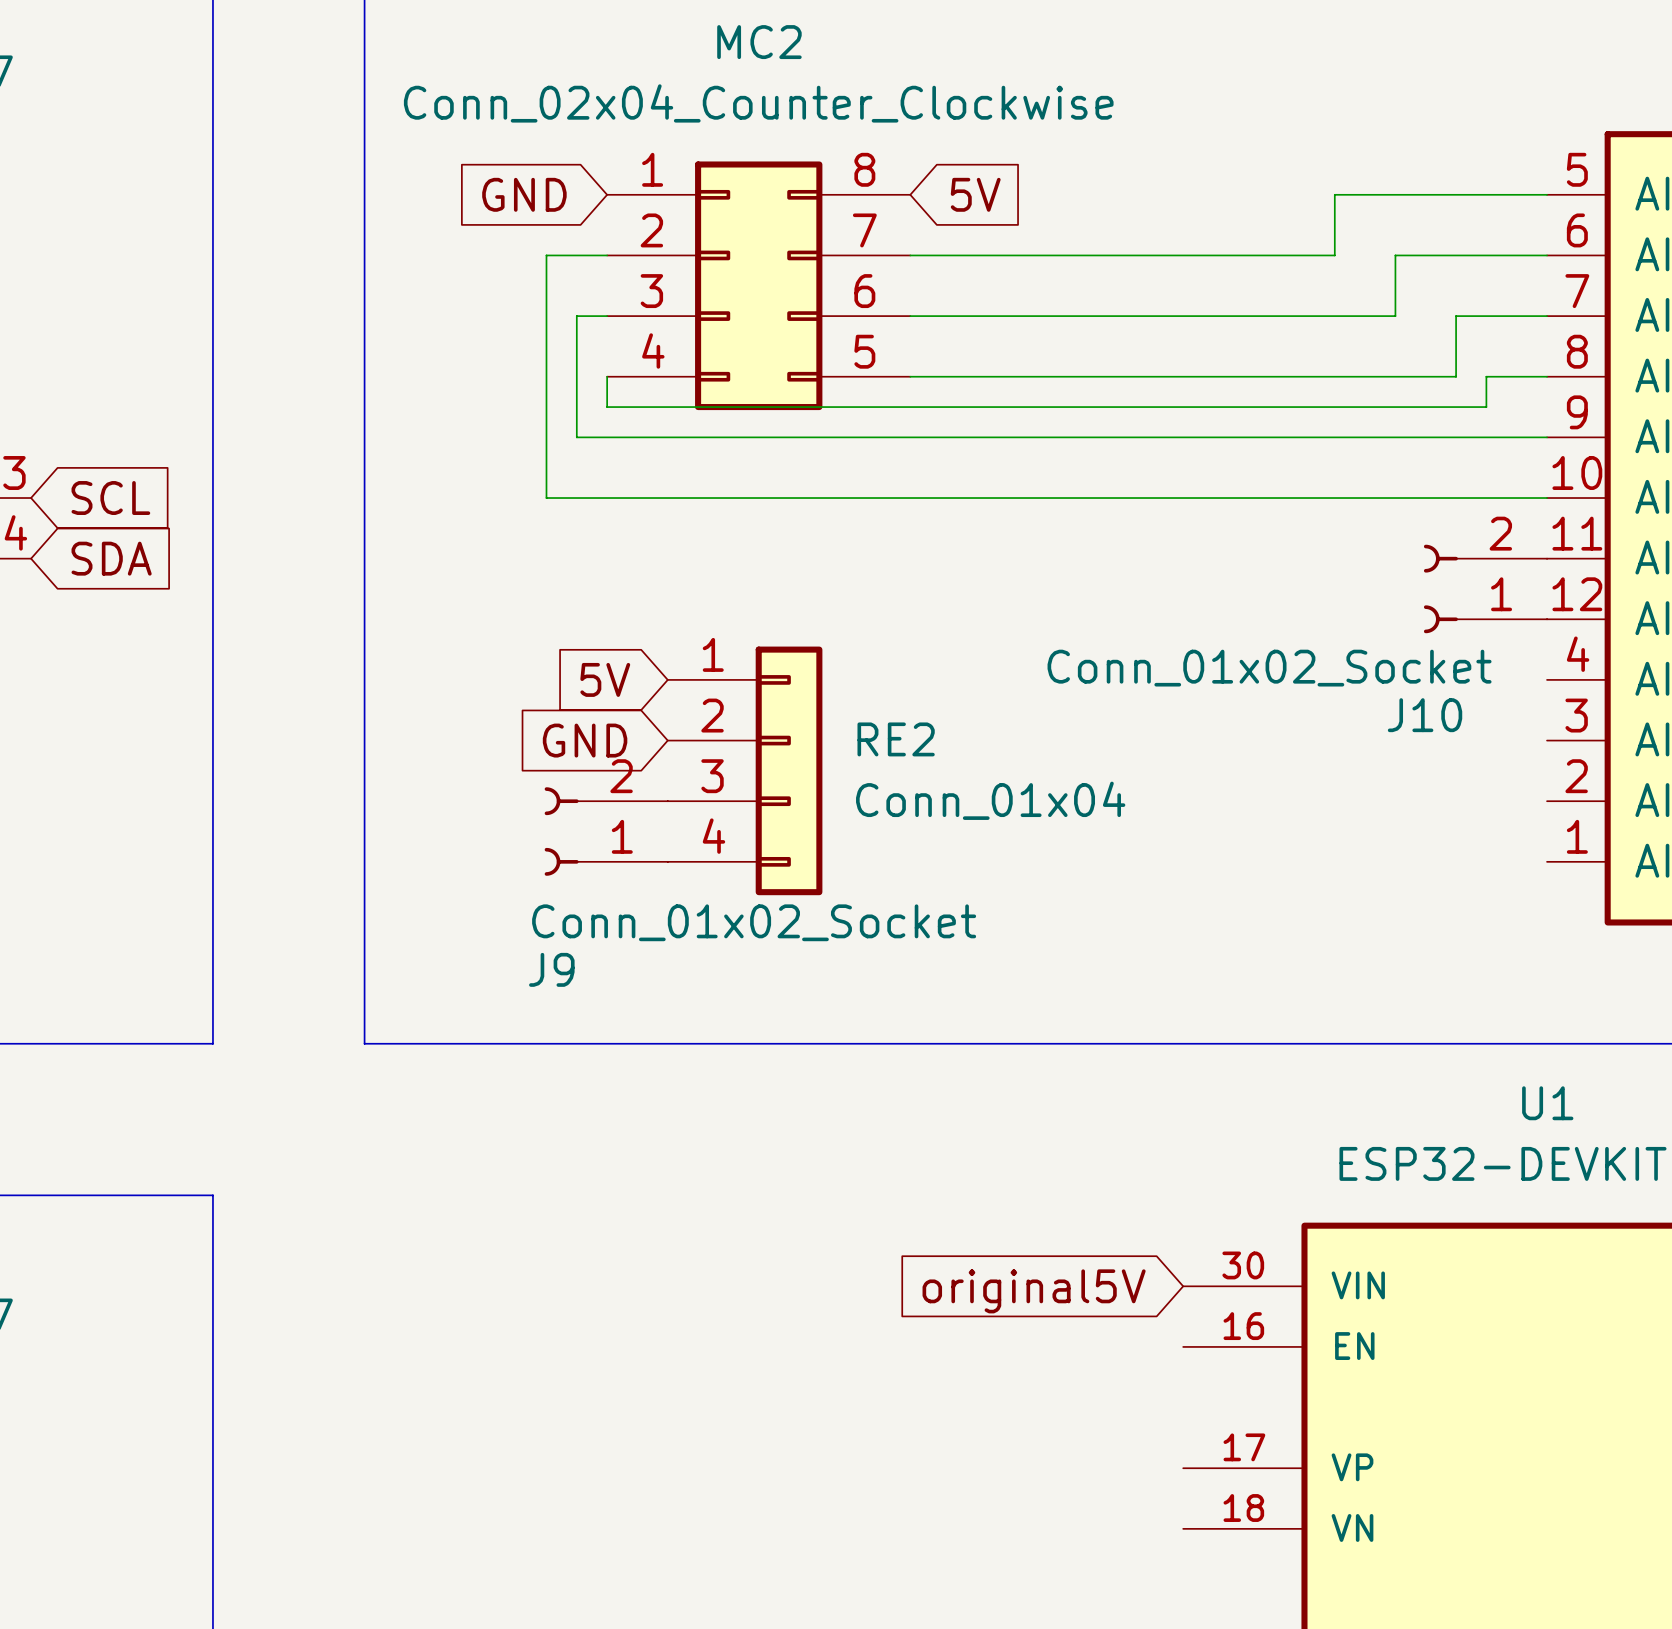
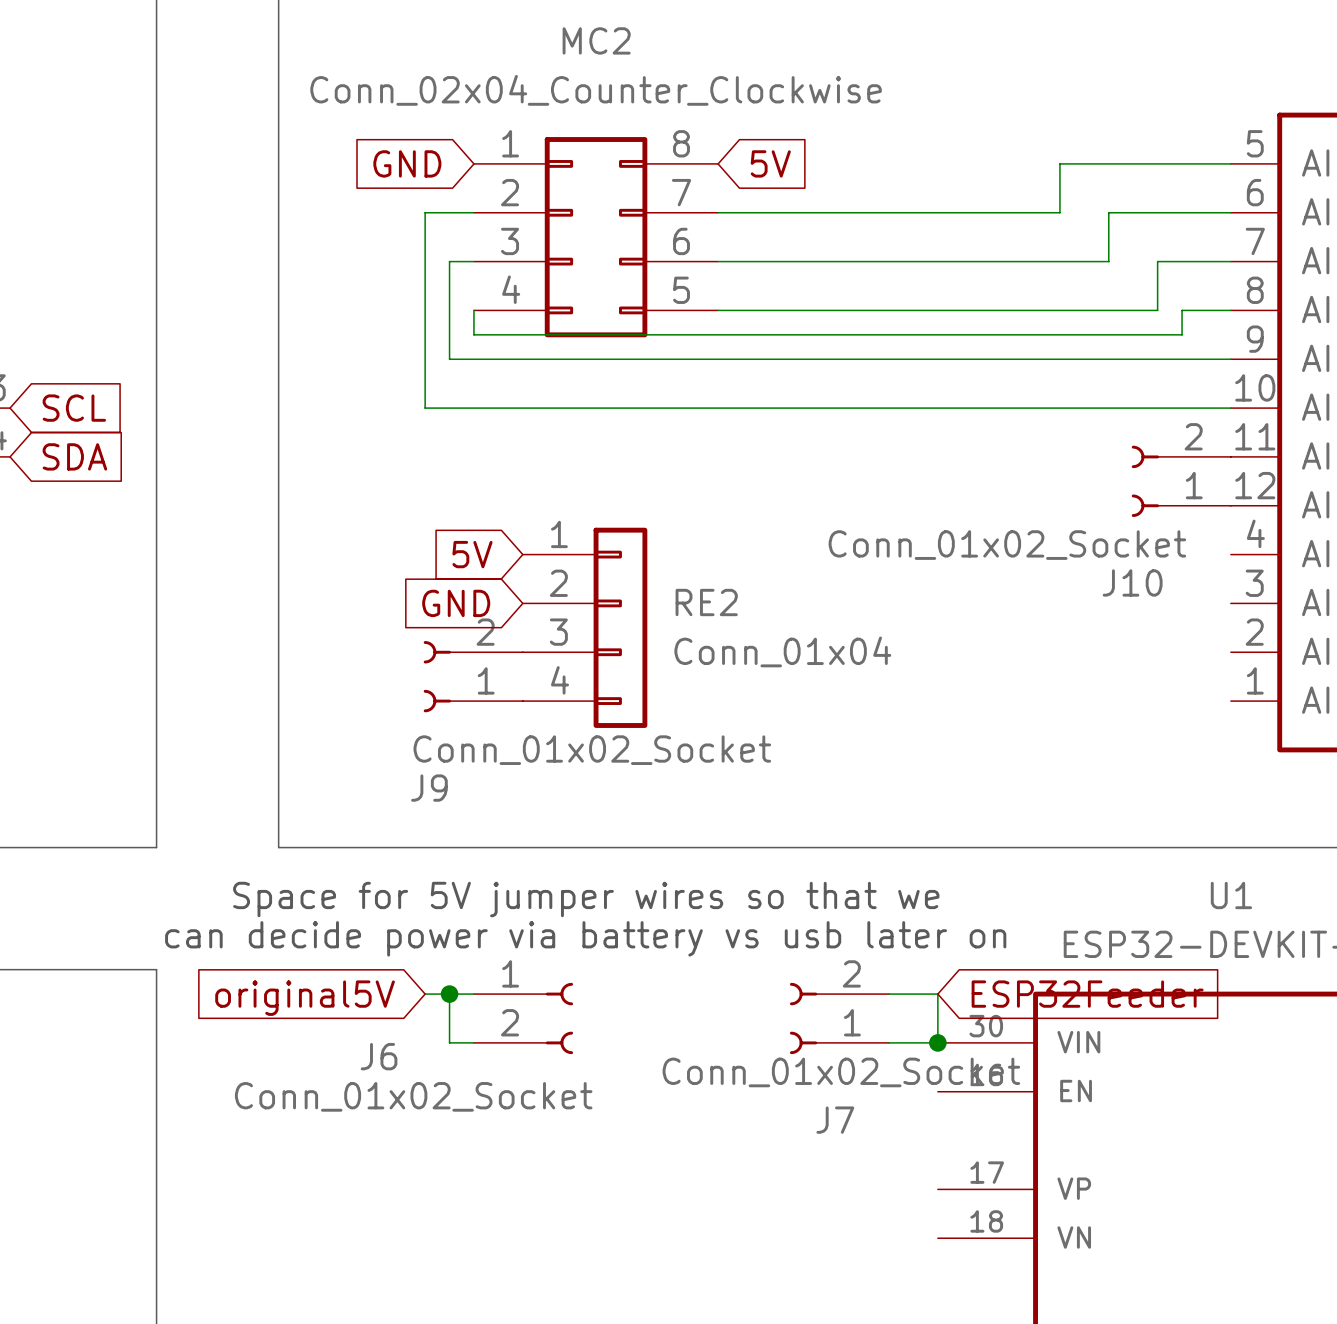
text: none -> Space for 5V jumper wires so that we (586, 899)
text: none -> can decide power via battery vs usb later on (585, 938)
wire: none -> (425, 994) (473, 994)
wire: none -> (449, 994) (449, 1042) (473, 1042)
junction: none -> (449, 994)
wire: none -> (889, 994) (937, 994) (937, 1042) (889, 1042)
global label: none -> ESP32Feeder (1087, 994)
global label: none -> original5V (305, 998)
J6: none -> Conn_01x02_Socket (523, 1018)
J7: none -> Conn_01x02_Socket (839, 1018)
junction: none -> (937, 1042)
global label: original5V (1034, 1291) -> none

